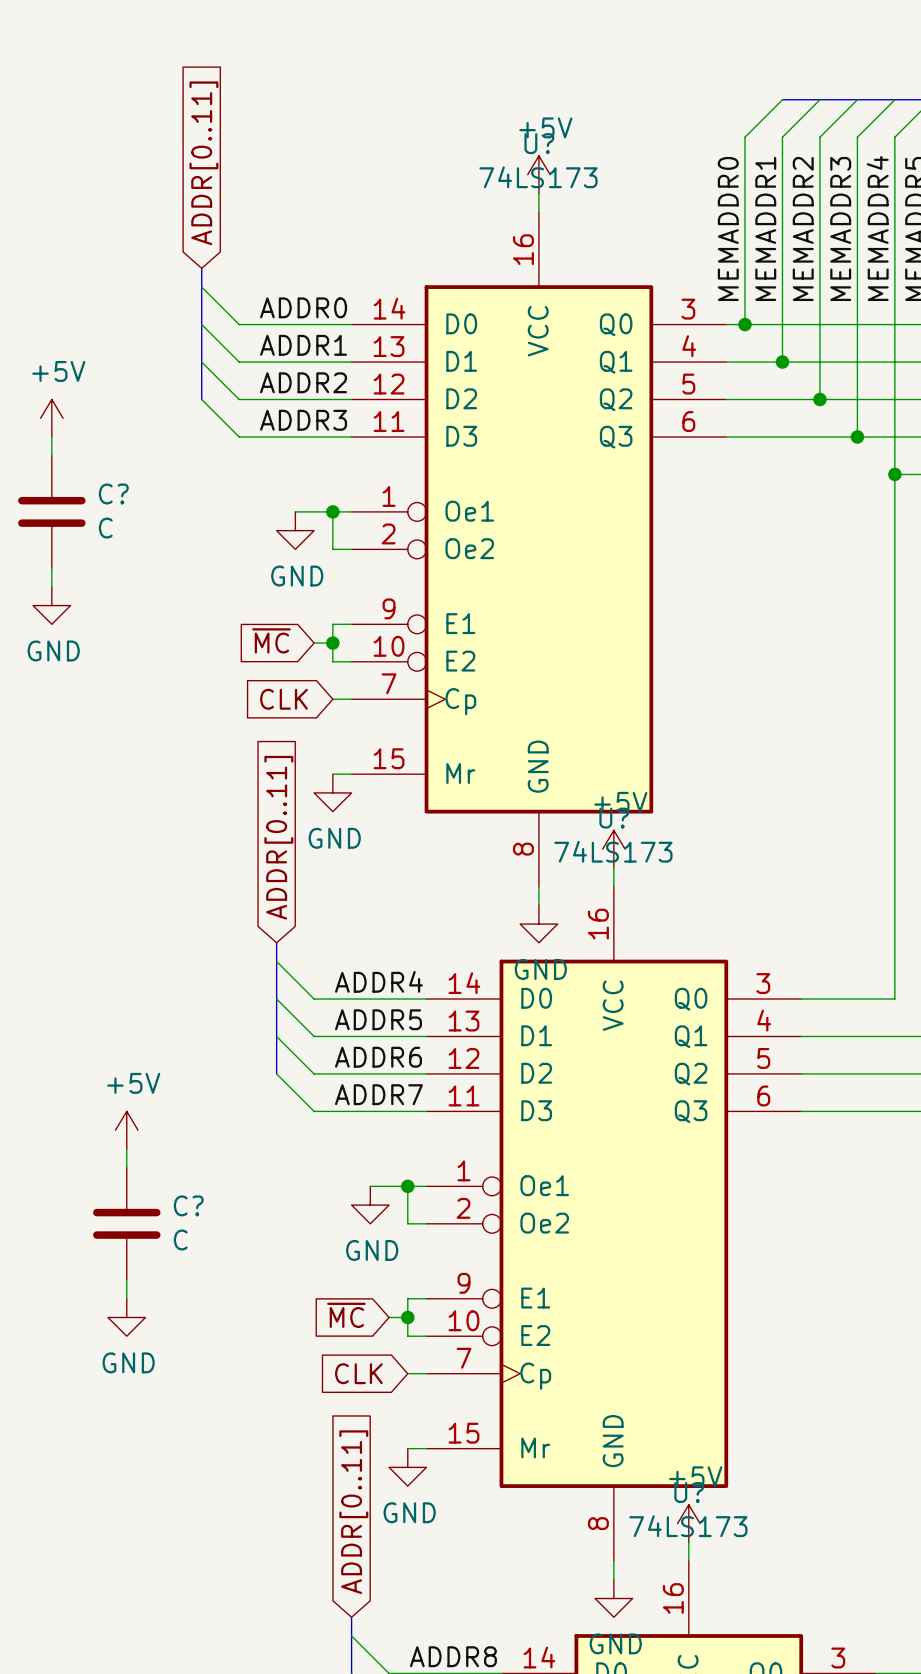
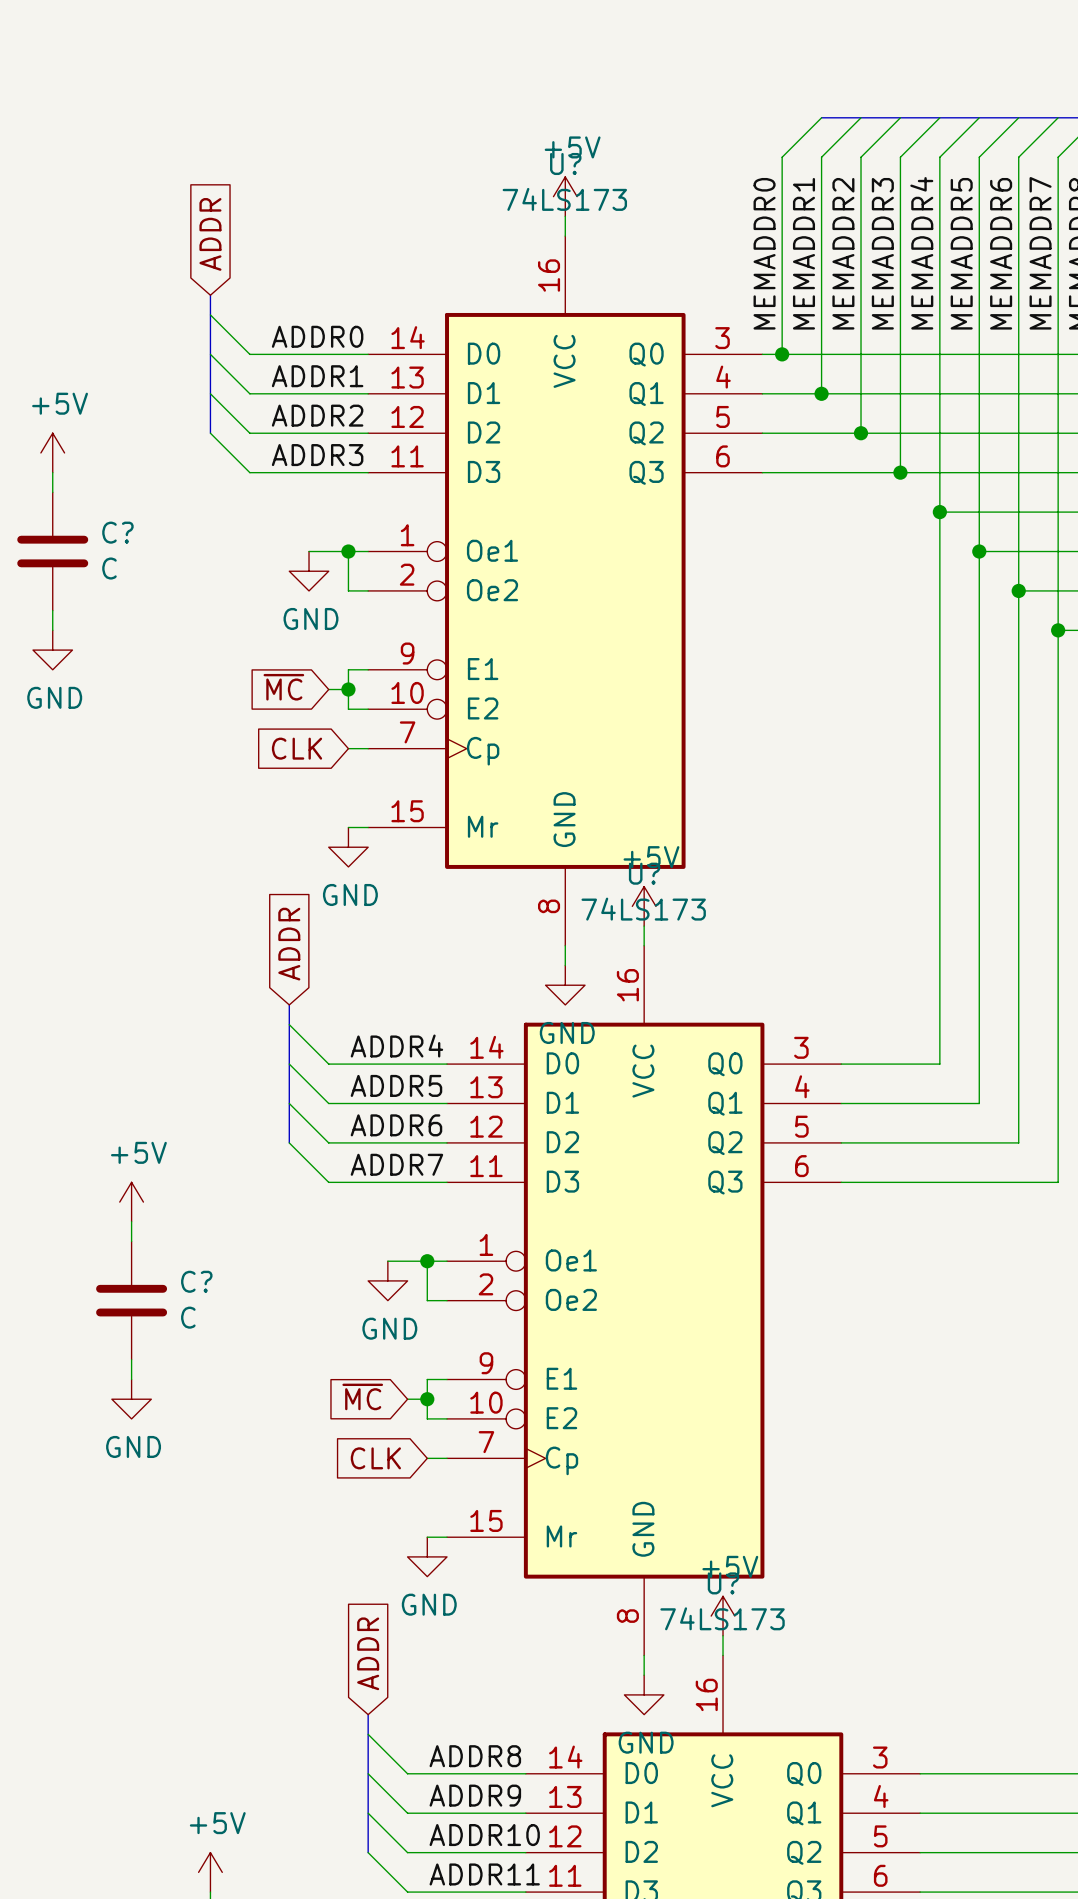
global label: ADDR[0..11] (203, 163) -> ADDR (210, 234)
global label: ADDR[0..11] (278, 837) -> ADDR (289, 944)
global label: ADDR[0..11] (353, 1512) -> ADDR (368, 1653)

